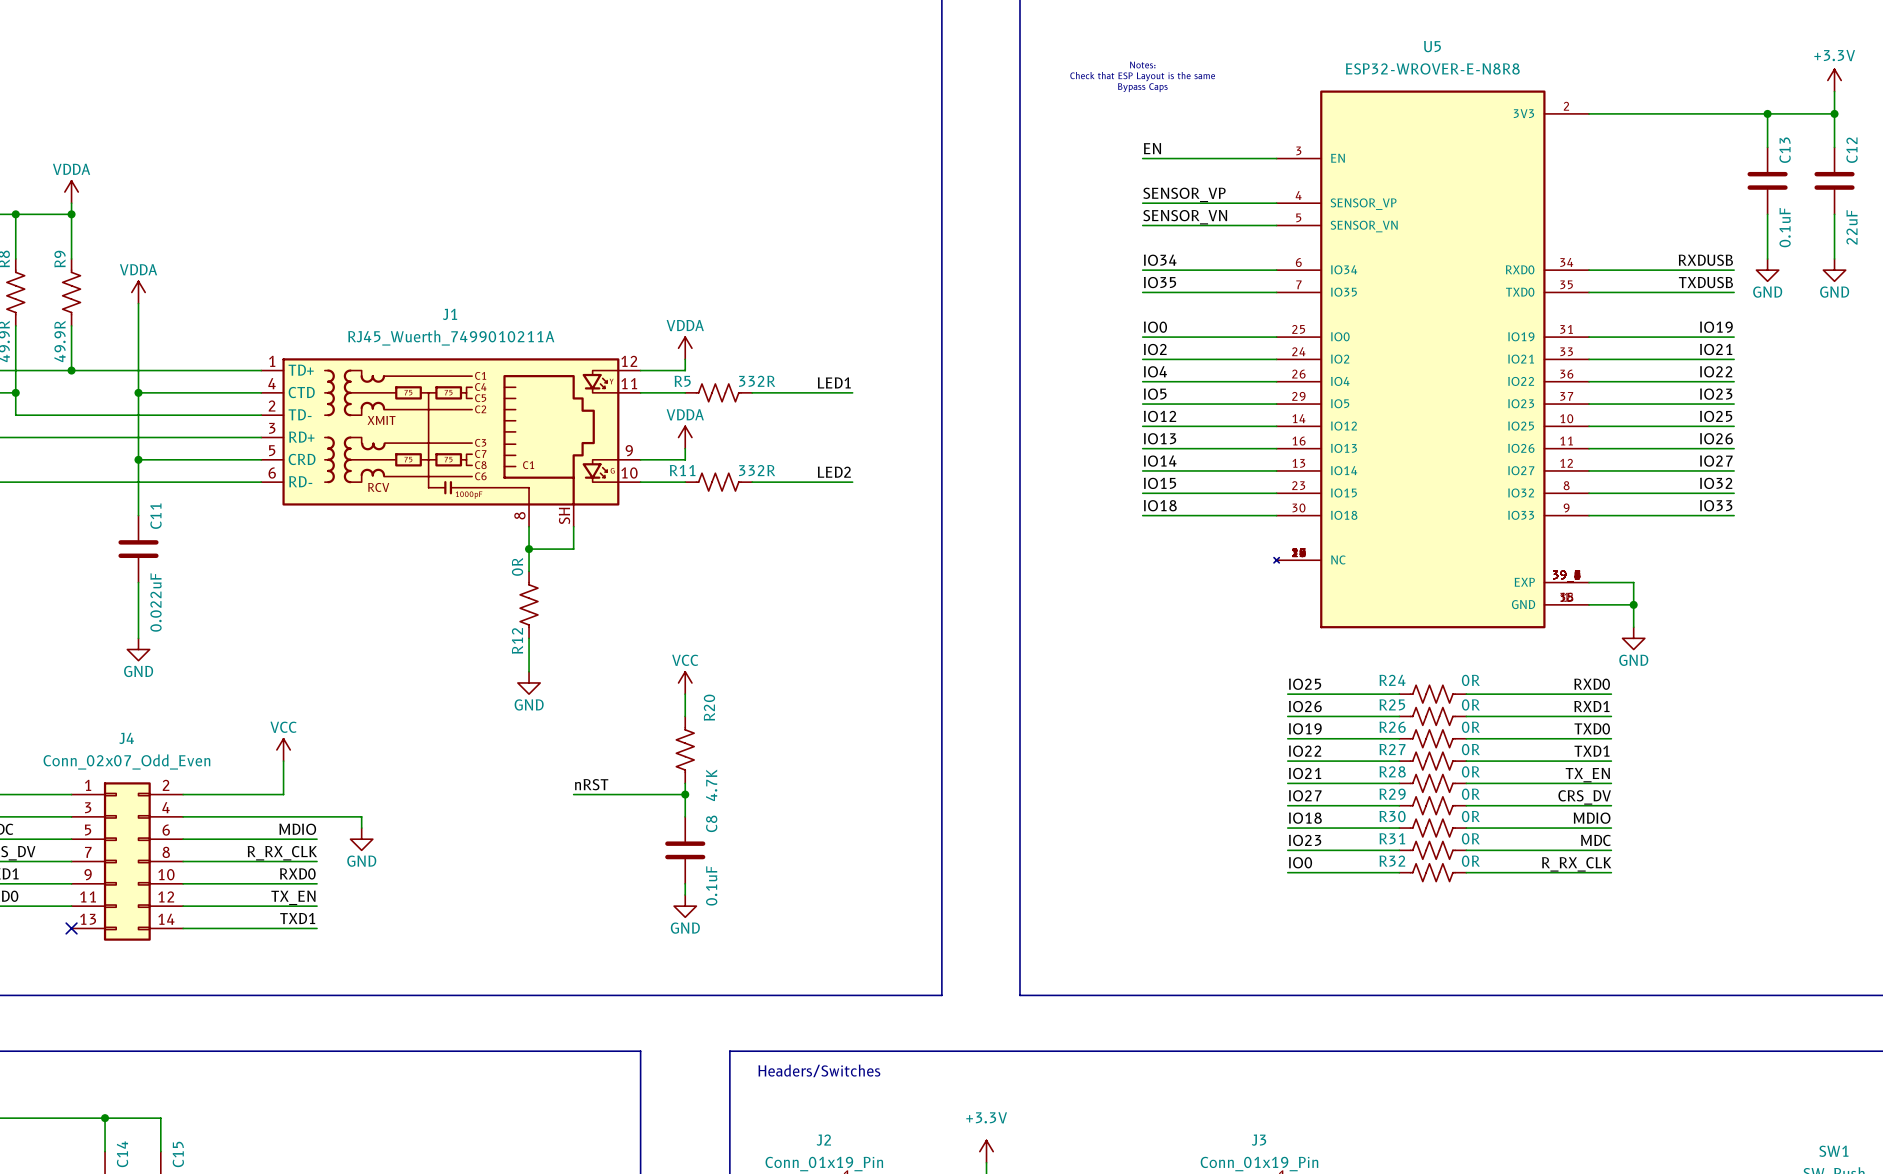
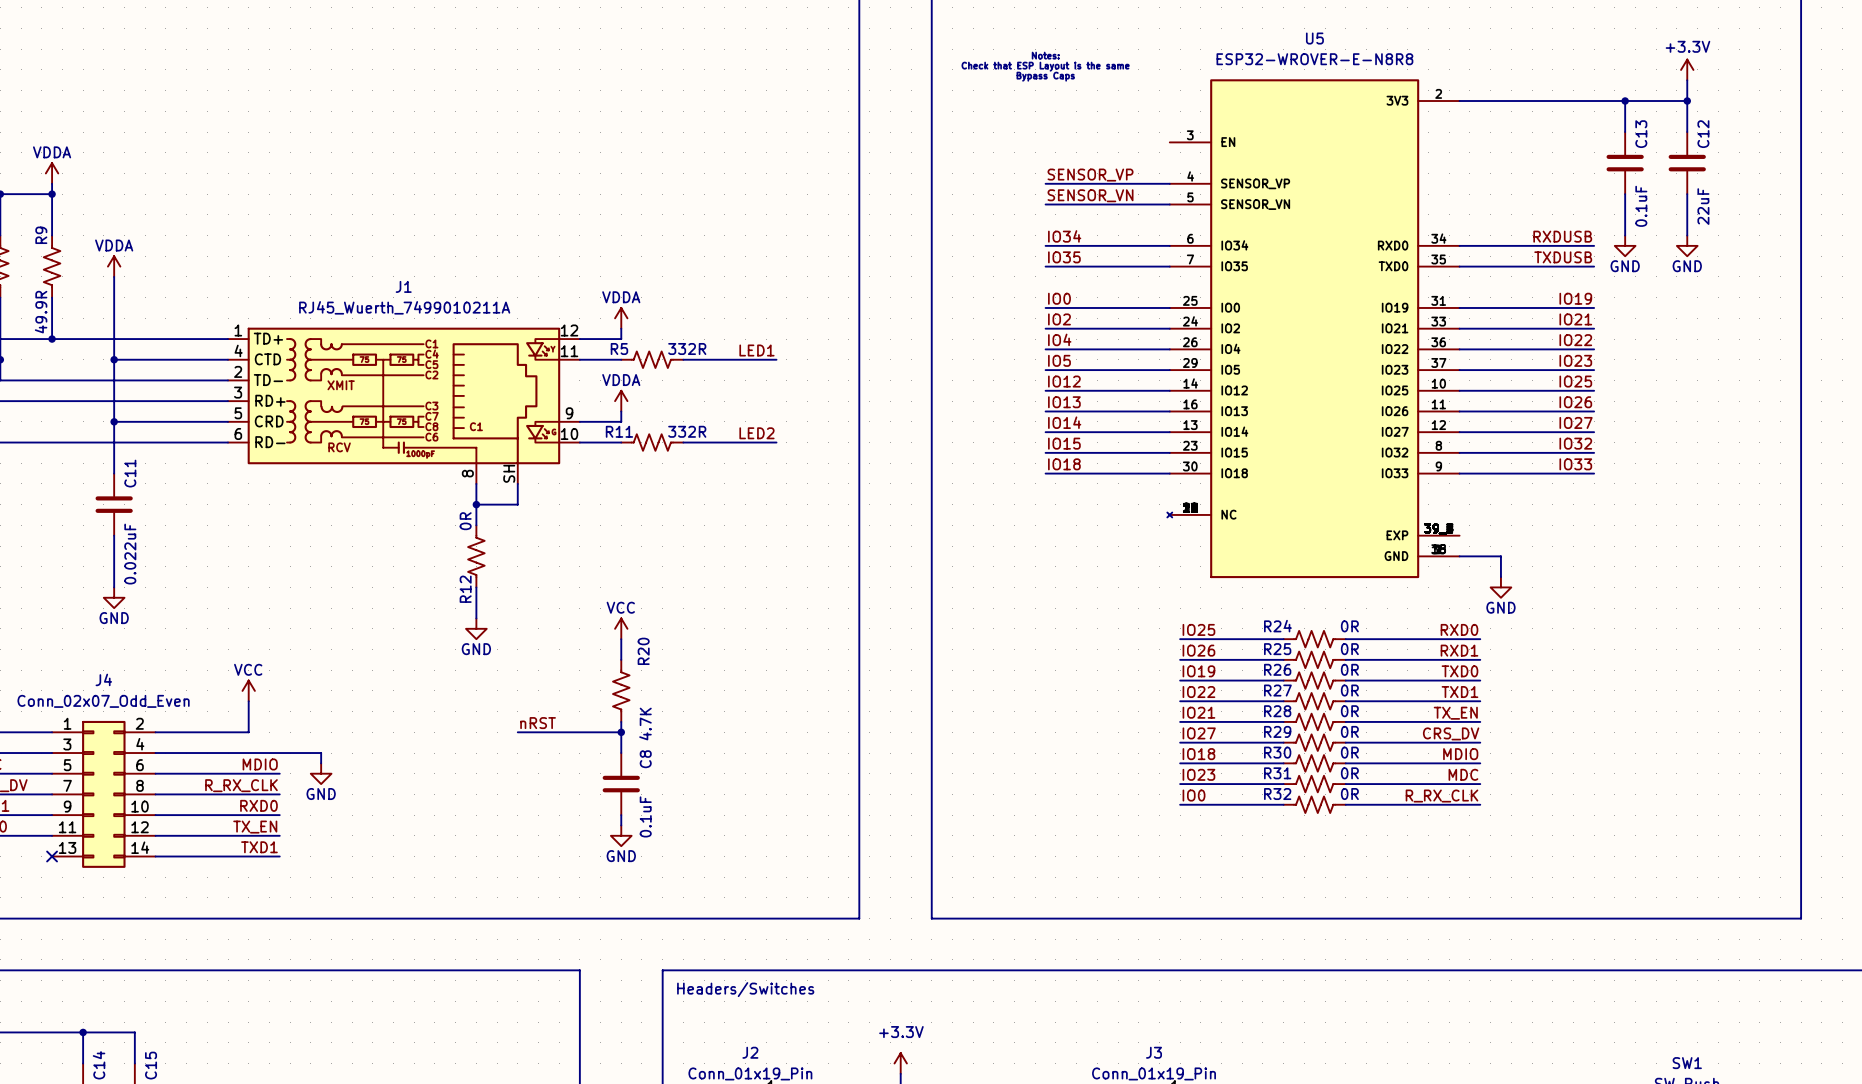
label: EN (1152, 148) -> none
wire: (1142, 158) (1276, 158) -> none
wire: (1589, 582) (1633, 582) (1633, 604) -> none
junction: (1633, 604) -> none

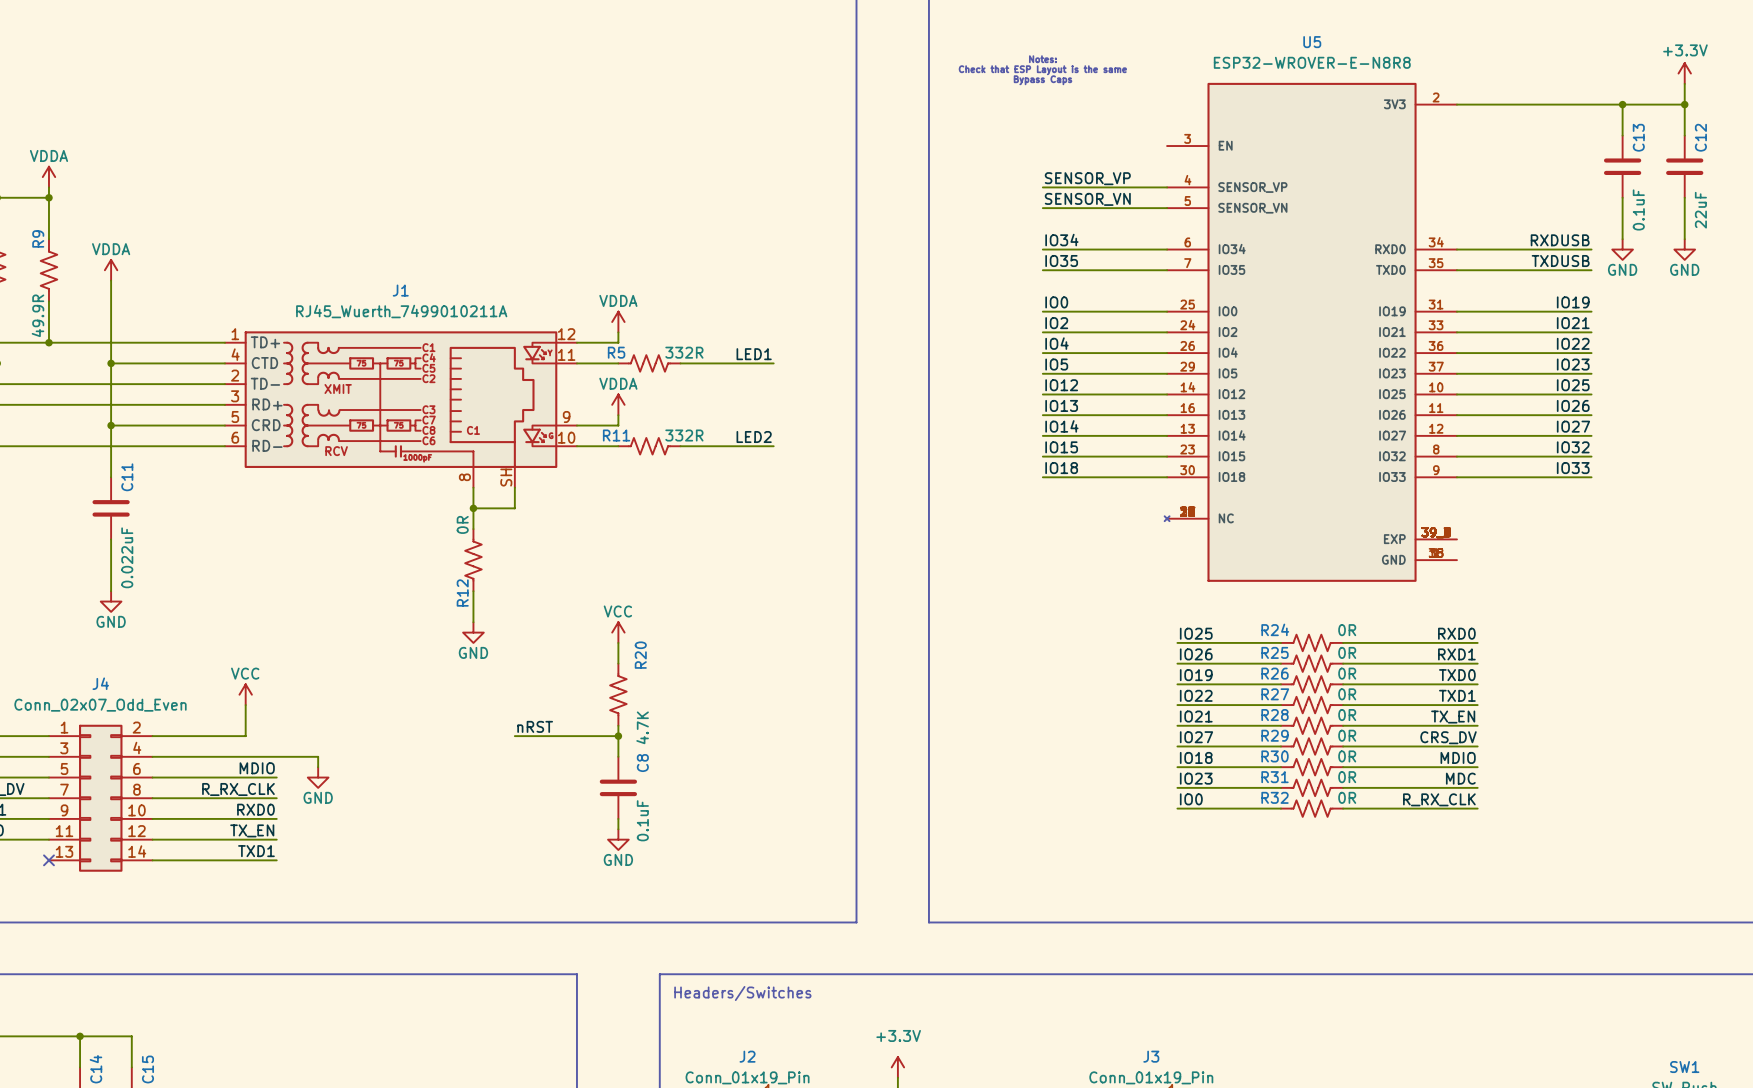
wire: (1459, 556) (1500, 556) (1500, 577) -> none
power symbol: GND (1500, 587) -> none

